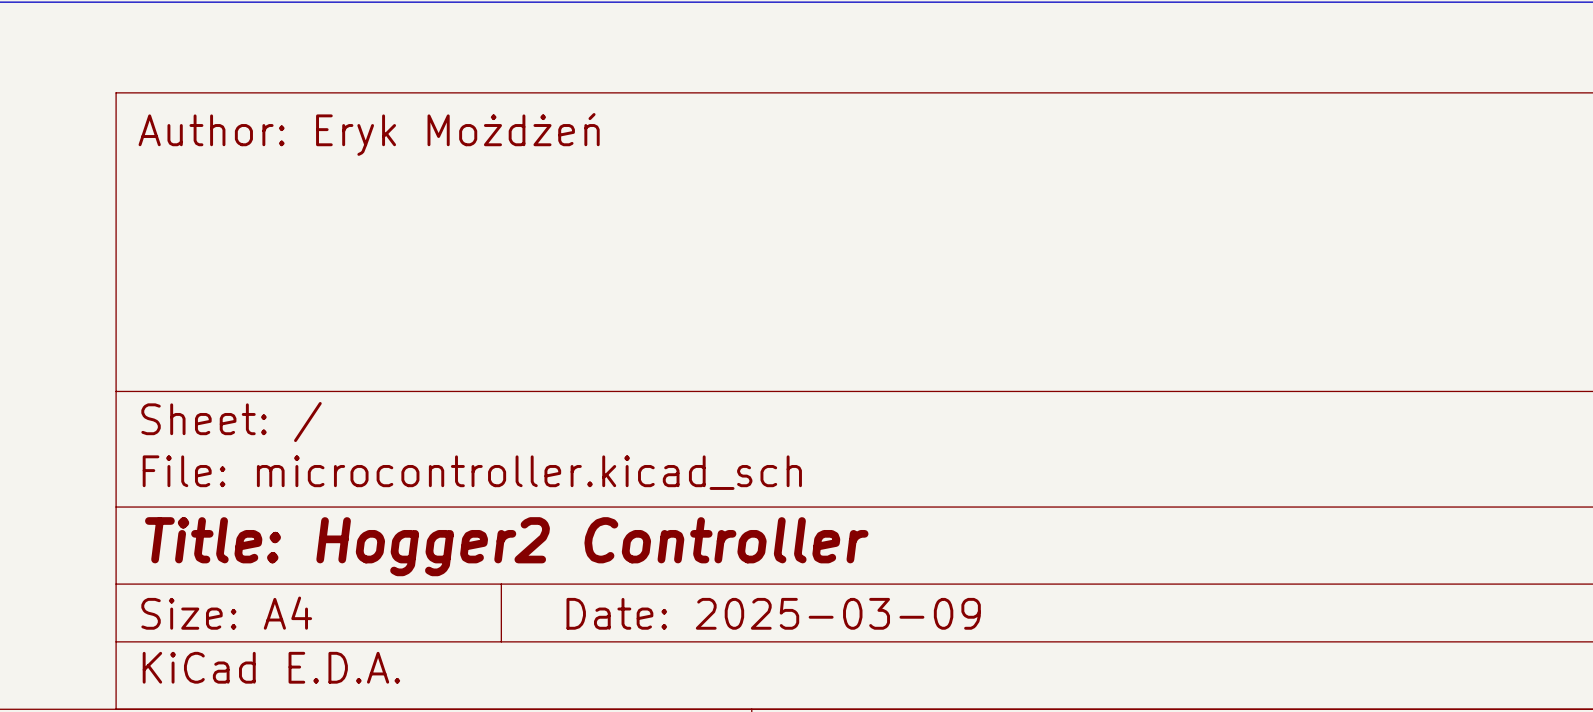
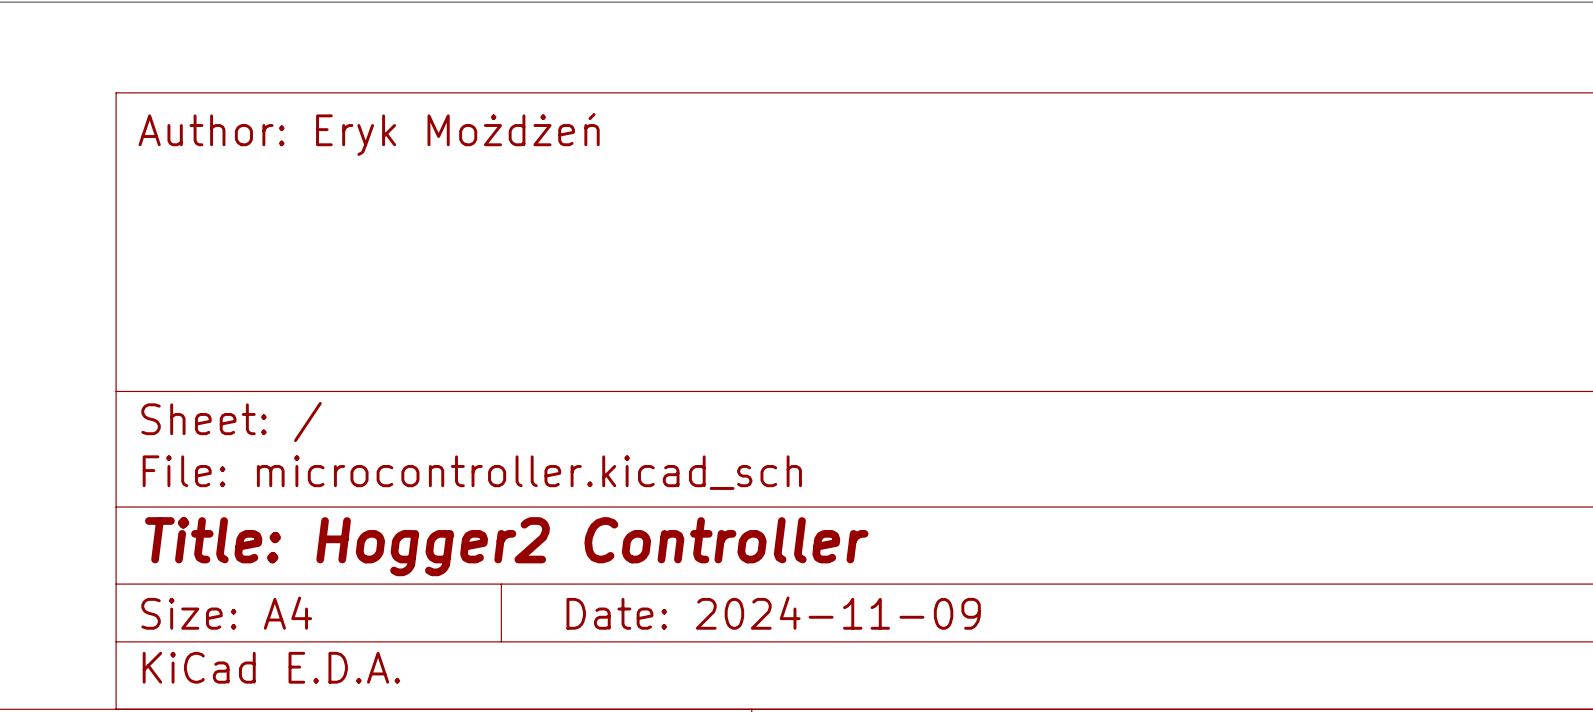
title block: Date: 2025-03-09 (773, 613) -> Date: 2024-11-09 (773, 613)

